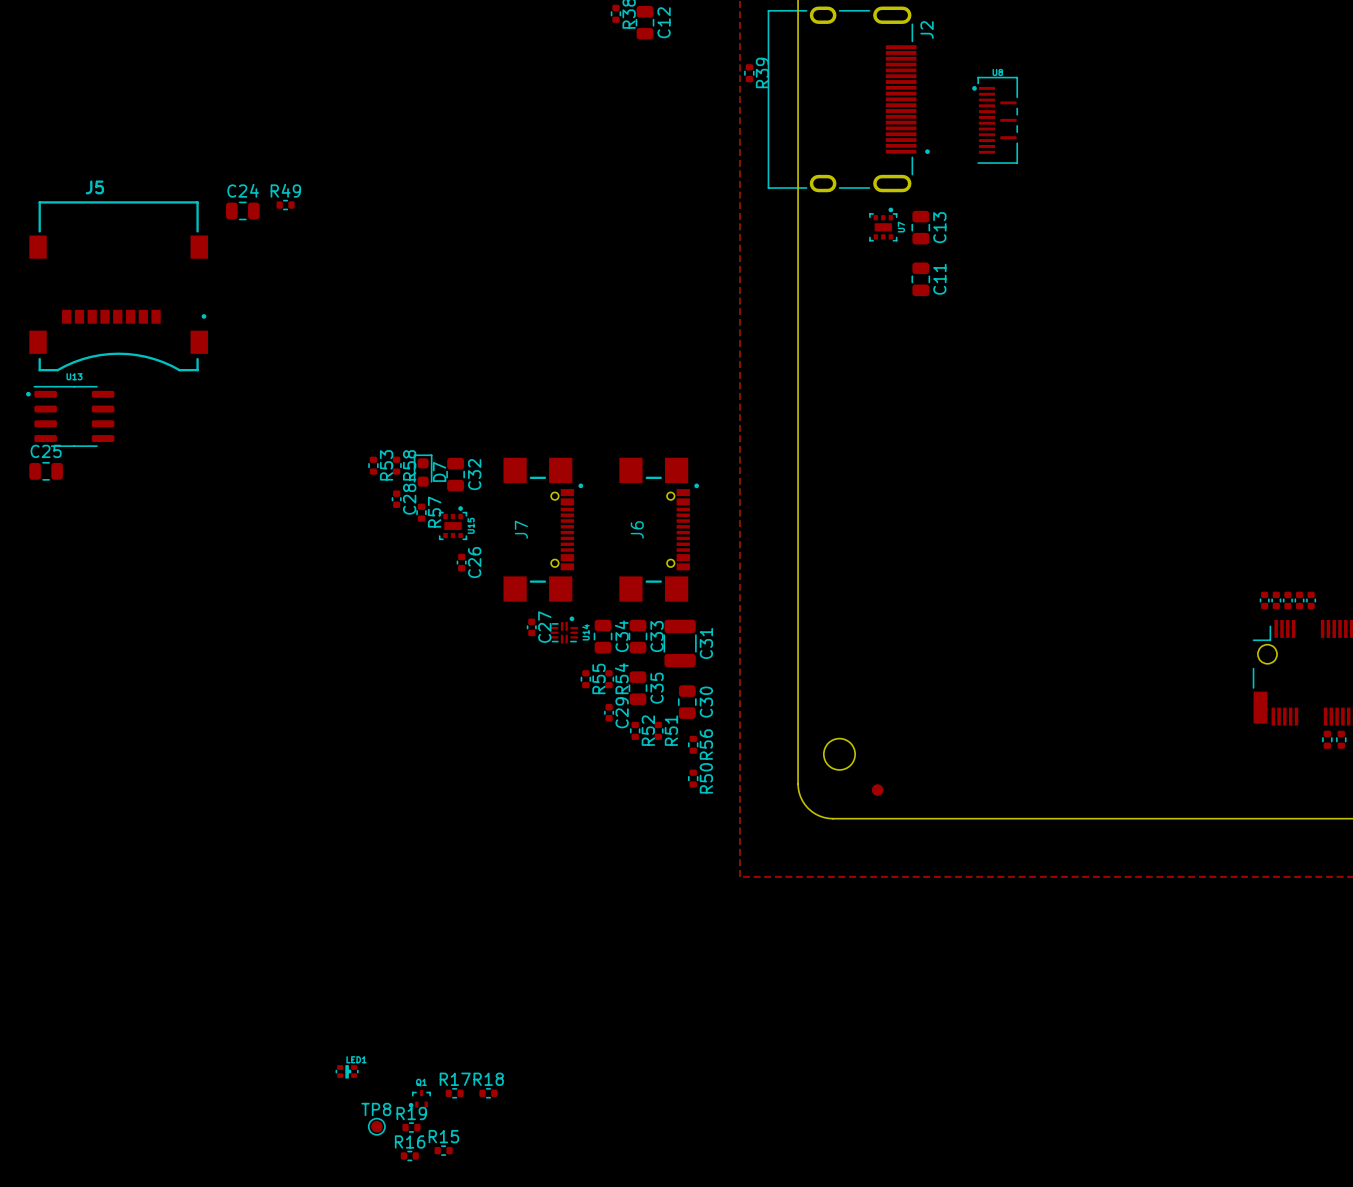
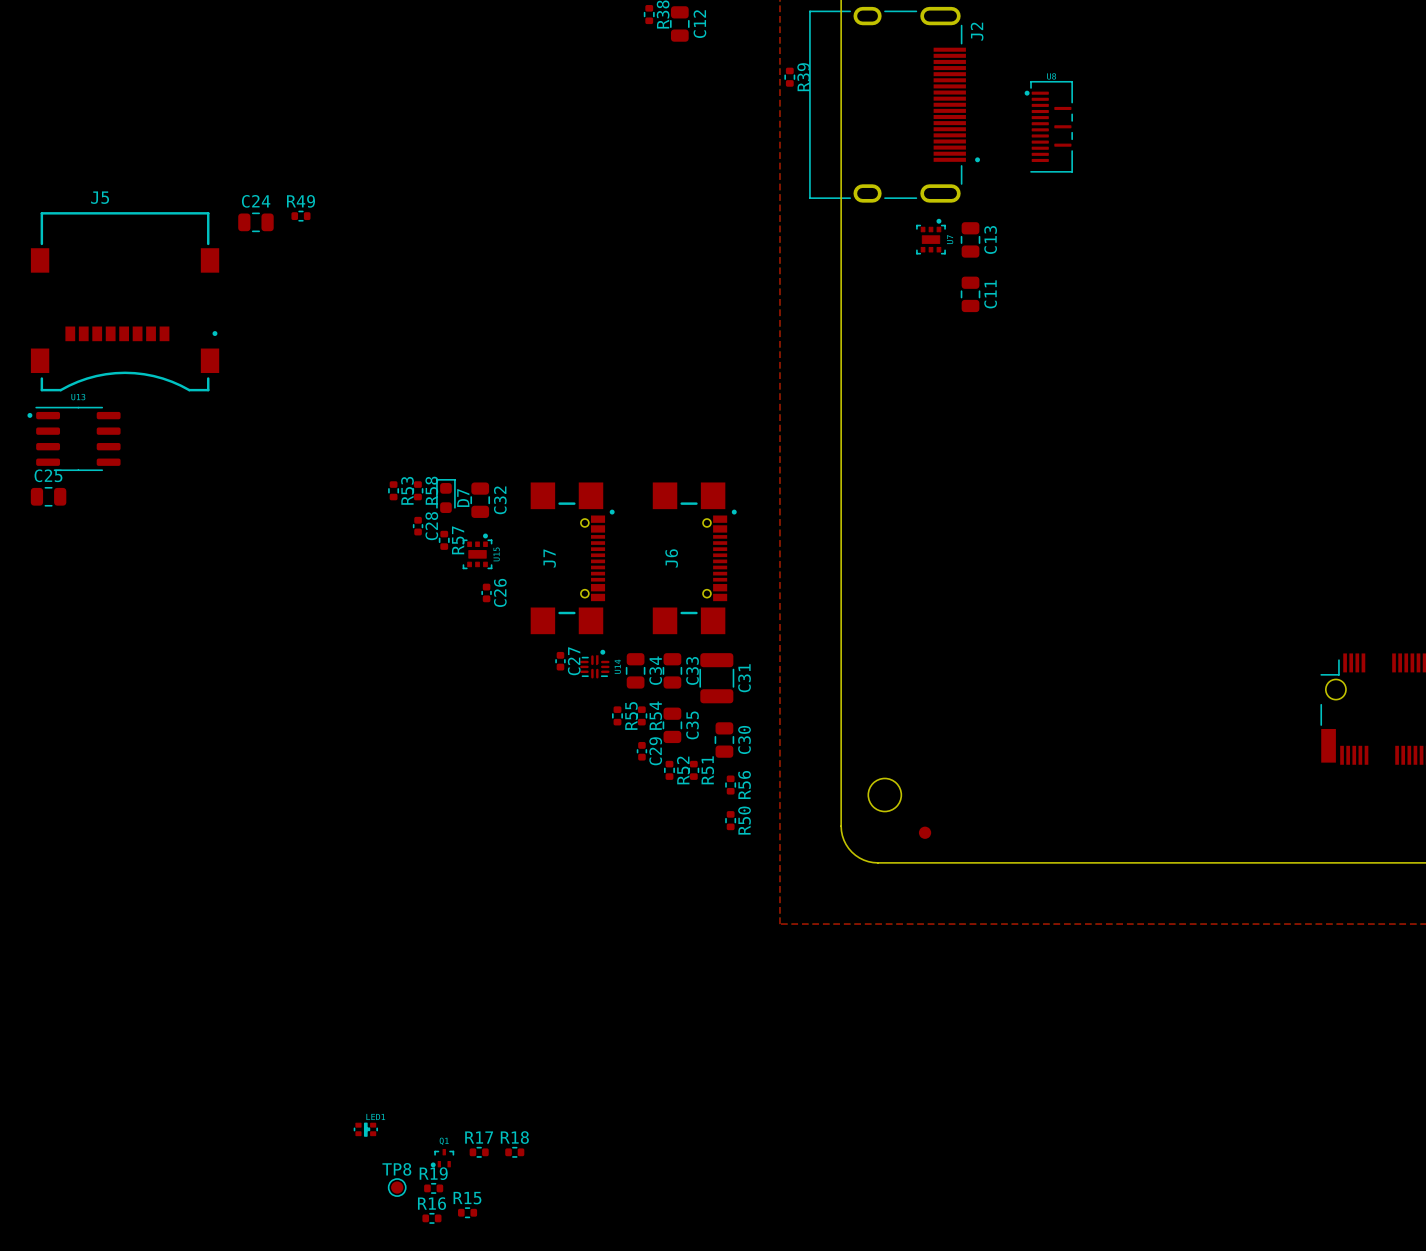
part: (1264, 600) -> none
part: (1276, 600) -> none
part: (1287, 600) -> none
part: (1299, 600) -> none
part: (1311, 600) -> none
part: (1327, 739) -> none
part: (1341, 739) -> none

